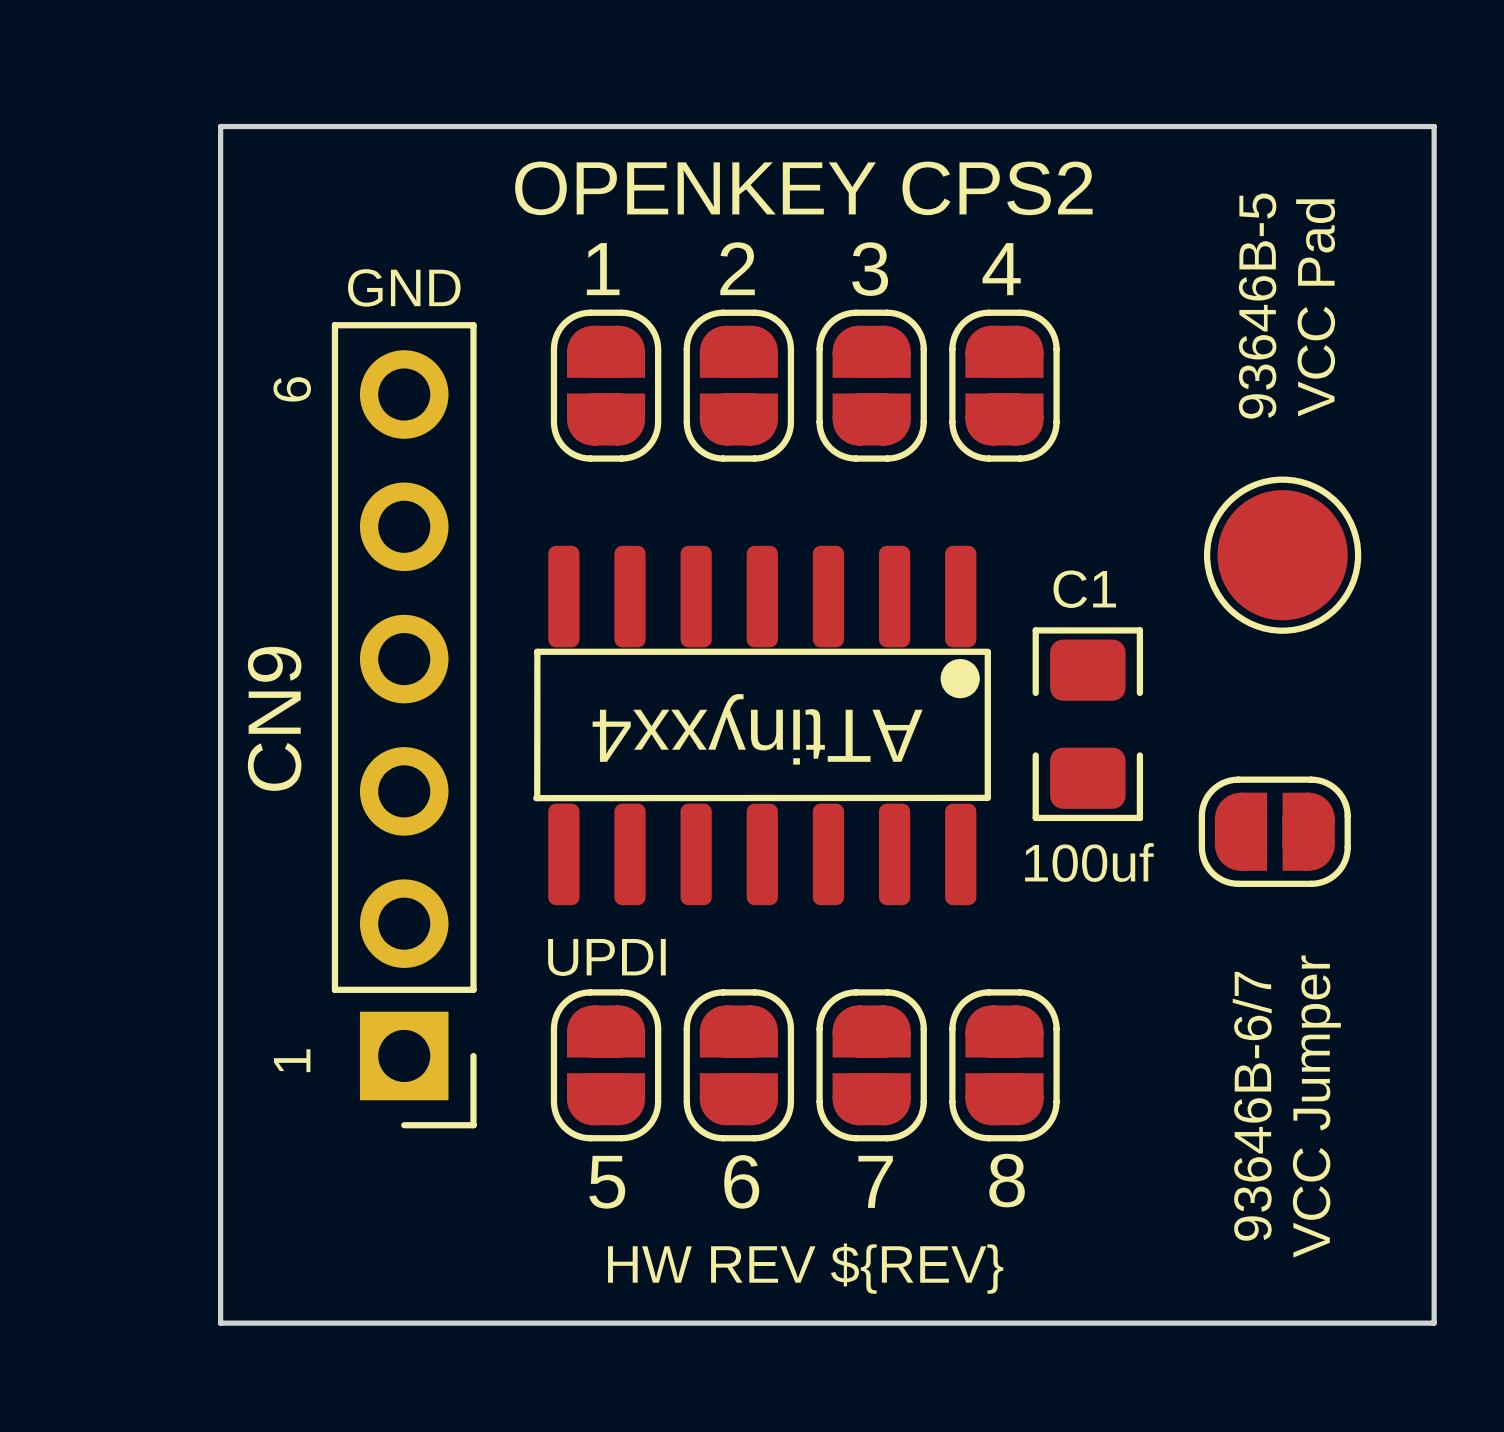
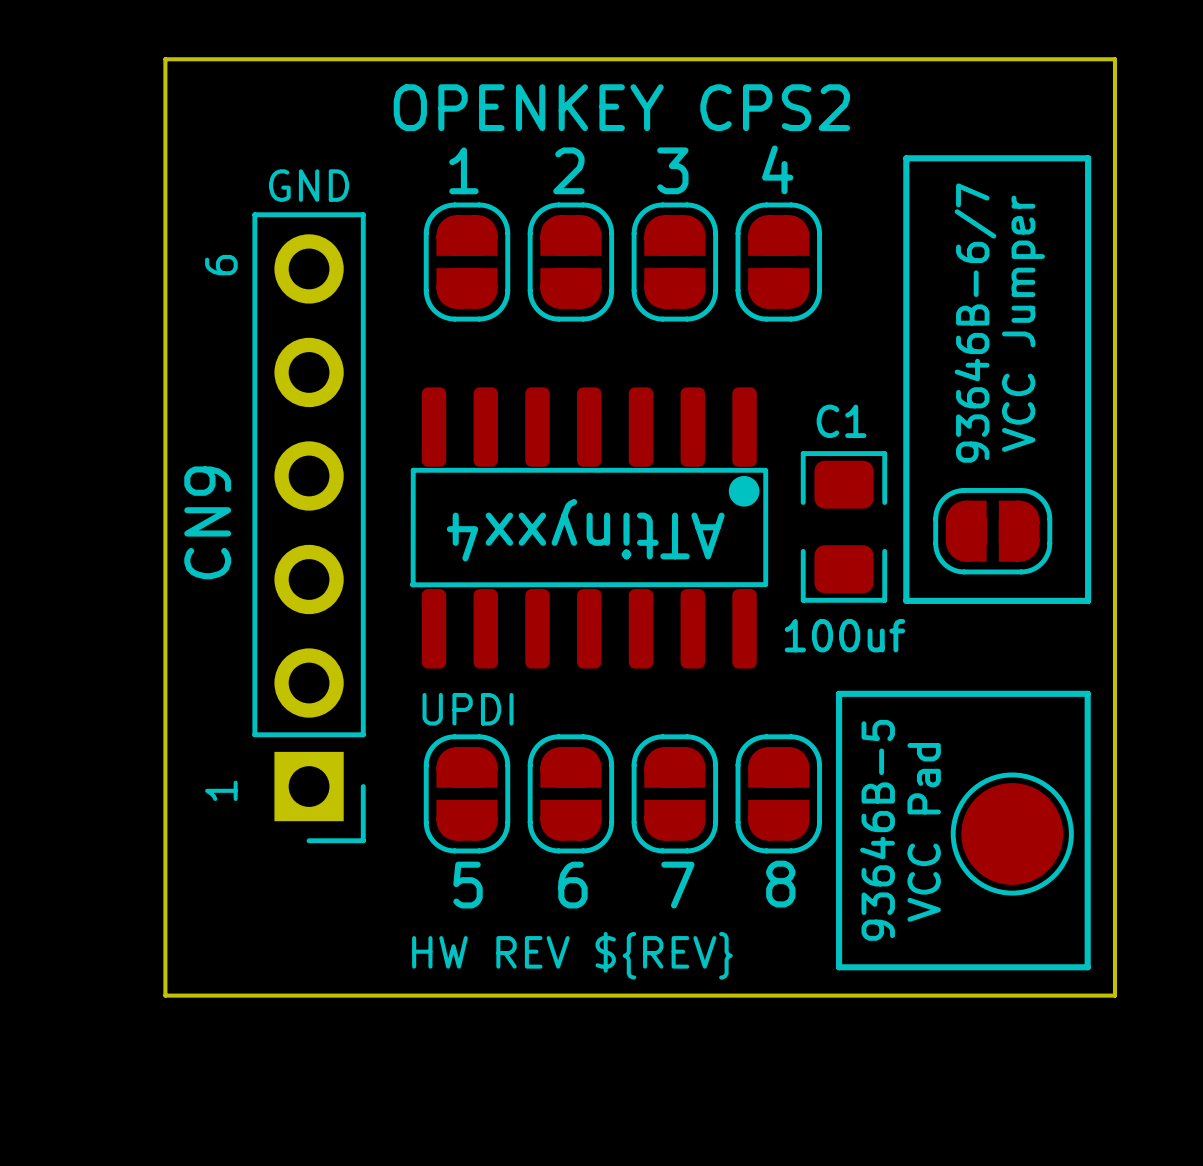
line: none -> (906, 158) (1088, 158) (1088, 600) (906, 600) (906, 158)
text position: 93646B-5 (1257, 306) -> 93646B-5 (877, 830)
text position: VCC Pad (1315, 307) -> VCC Pad (924, 832)
part position: (1282, 555) -> (1012, 834)
part position: (1274, 831) -> (992, 531)
line: none -> (839, 693) (1087, 693) (1087, 967) (839, 967) (839, 693)
text position: 93646B-6/7 (1252, 1106) -> 93646B-6/7 (975, 323)
text position: VCC Jumper (1316, 1106) -> VCC Jumper (1023, 323)
text position: HW REV ${REV} (805, 1268) -> HW REV ${REV} (572, 955)

